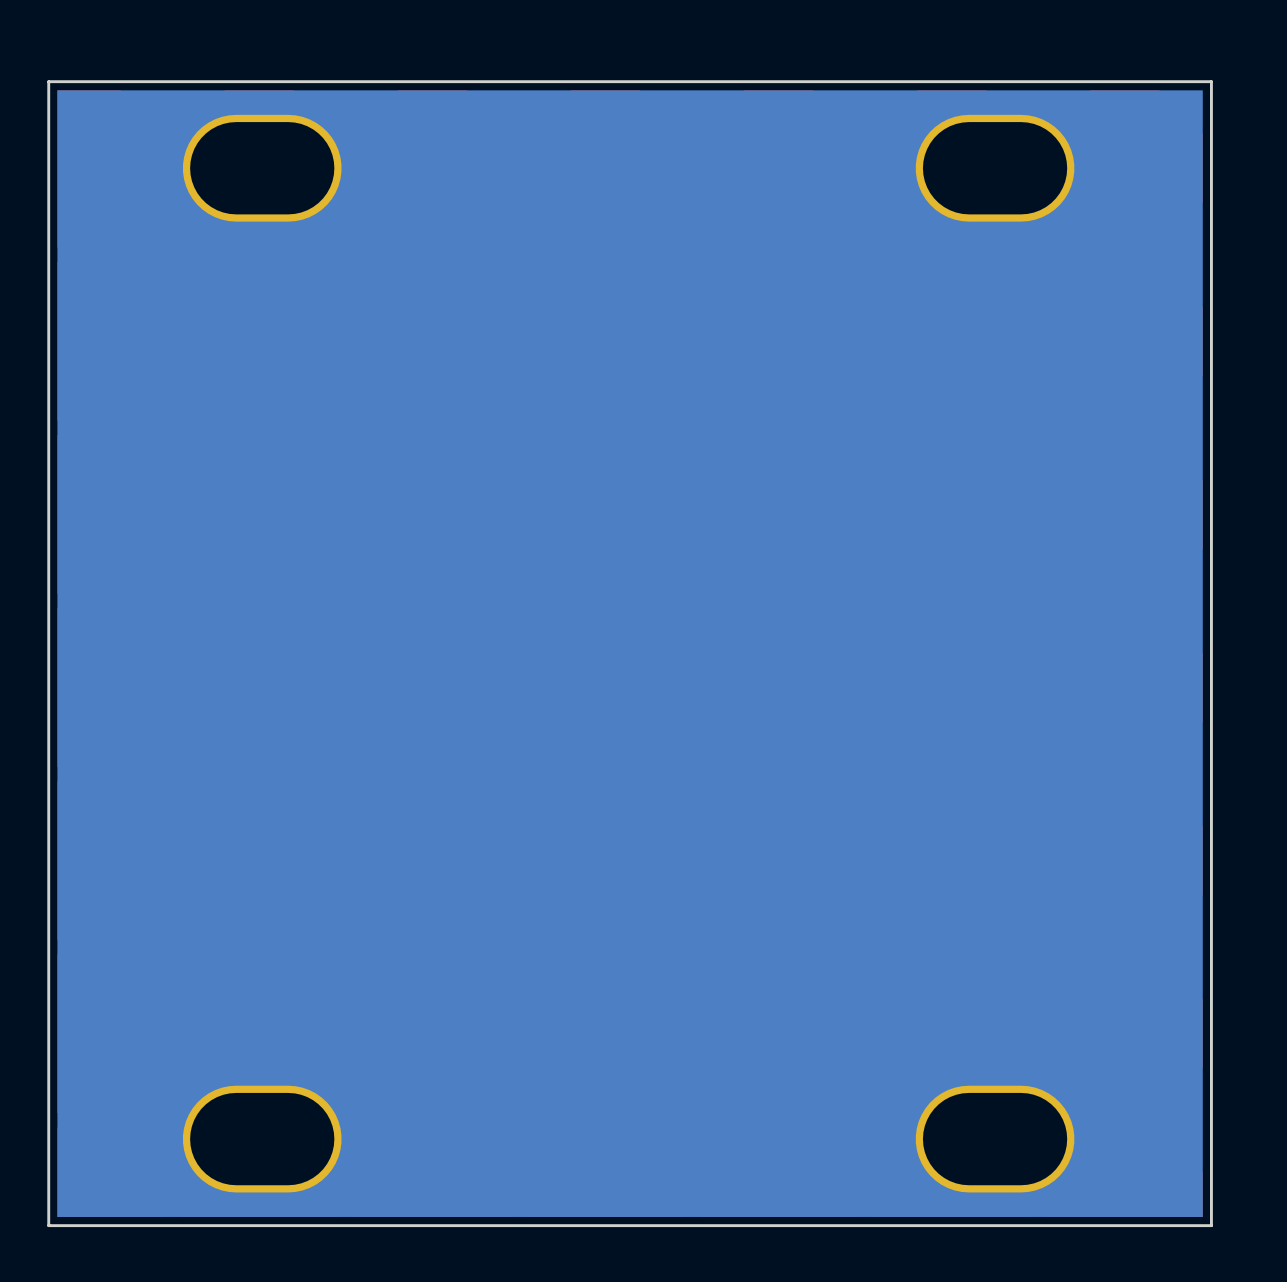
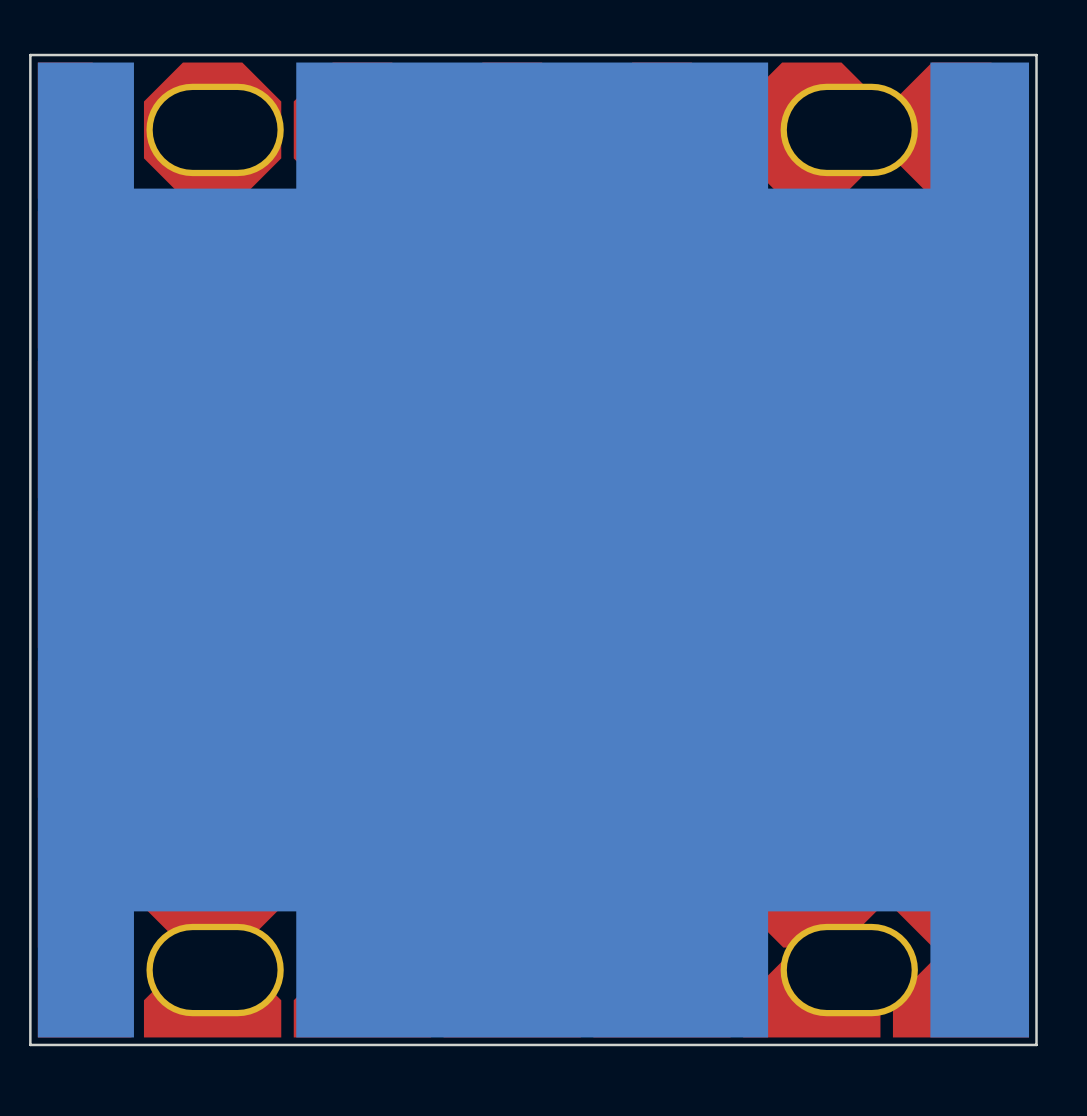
drawing shape: [57, 90, 1203, 1217] -> [133, 188, 931, 912]
drawing: none -> [37, 62, 134, 1038]
drawing: none -> [296, 62, 769, 189]
drawing: none -> [930, 62, 1030, 1038]
drawing: none -> [296, 911, 769, 1038]

